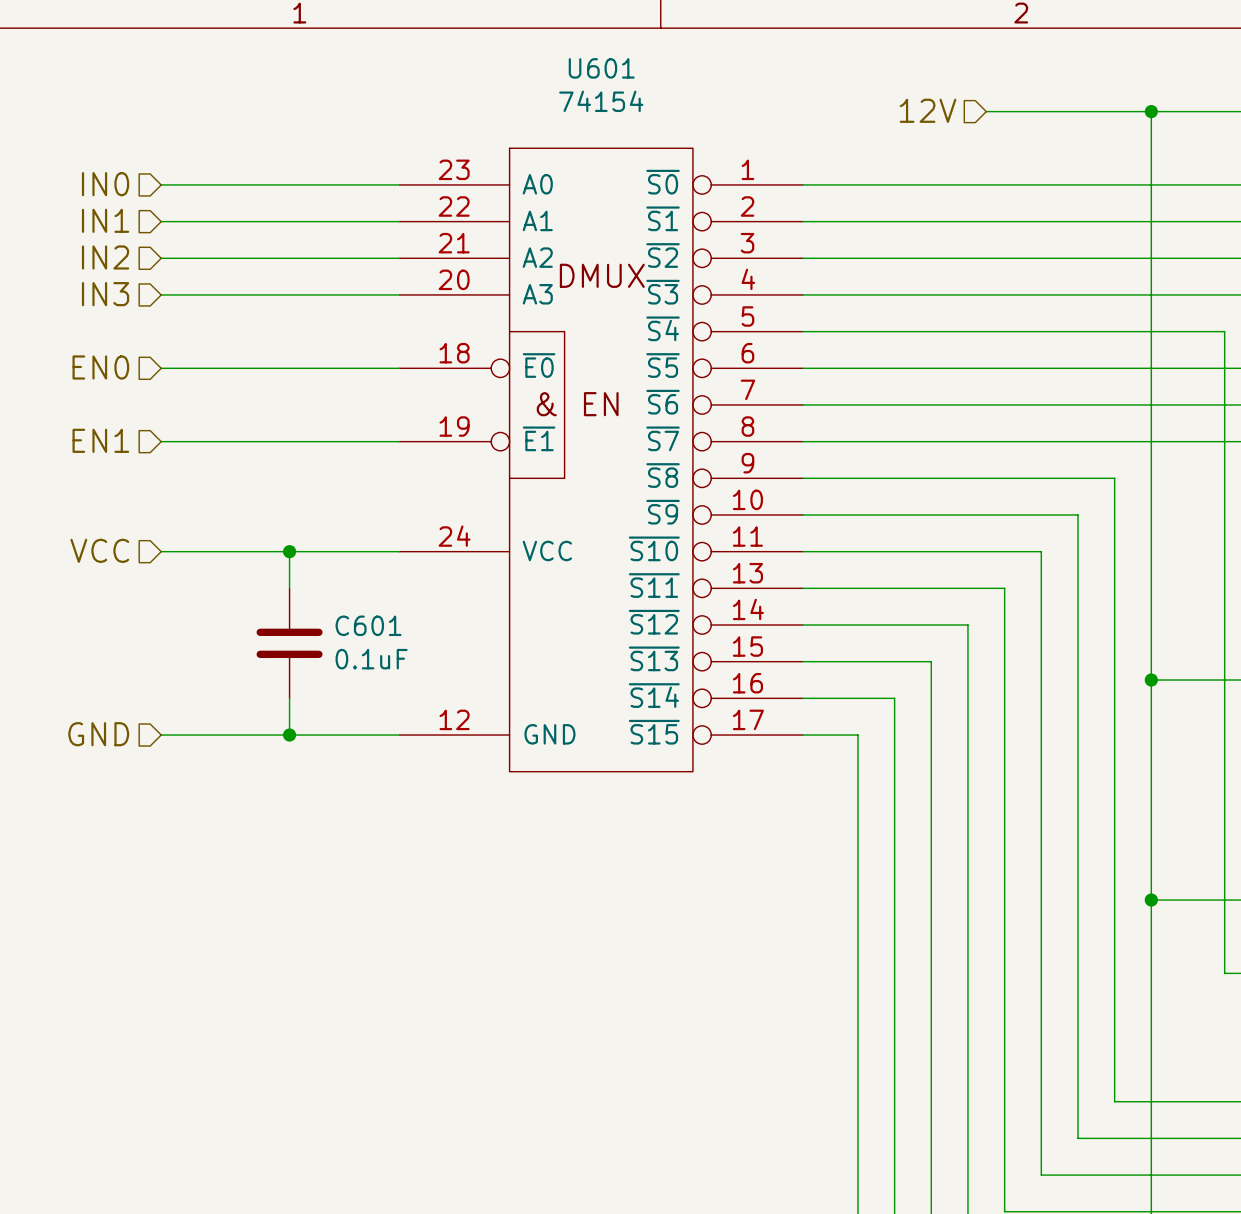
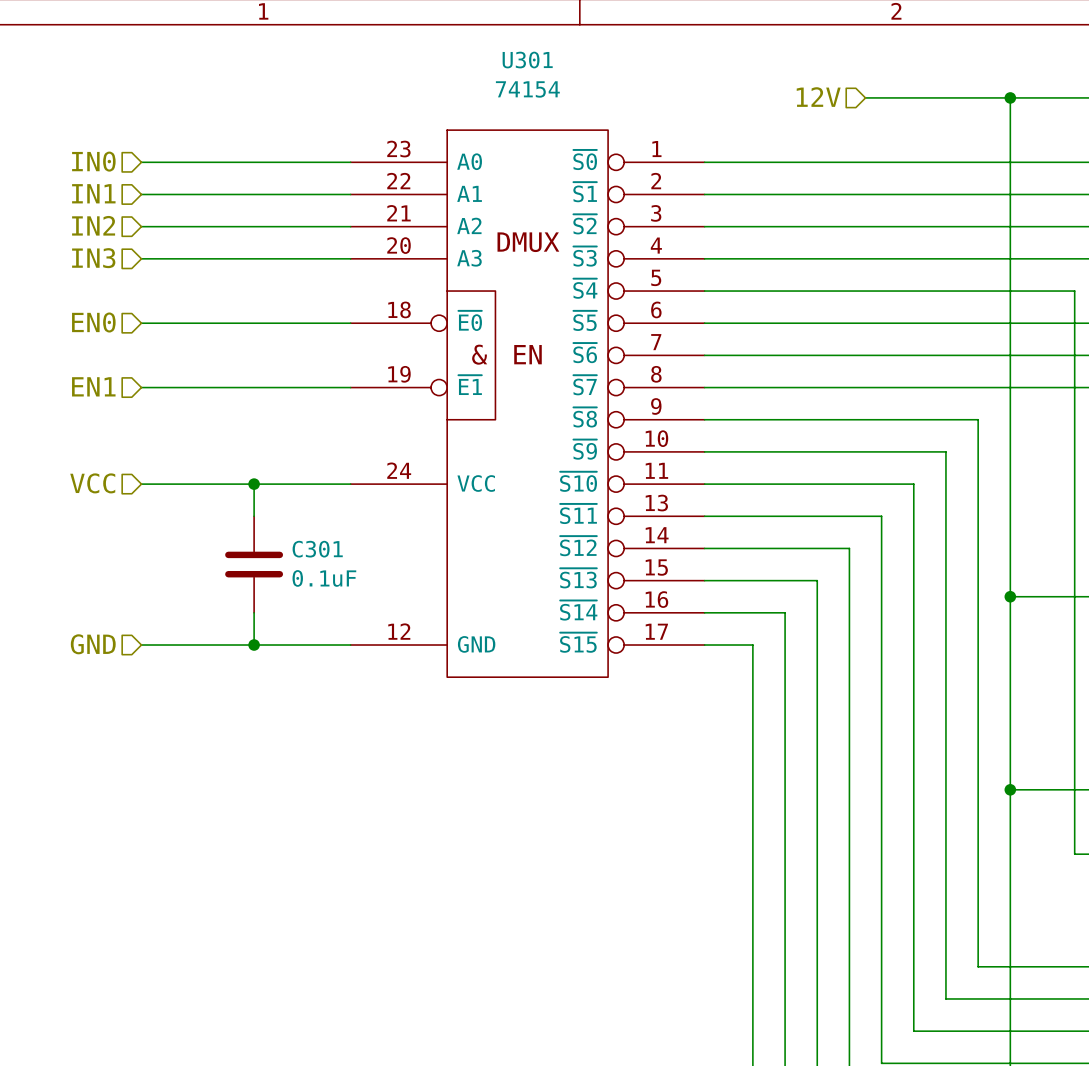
U601 name: U601 (601, 68) -> U301 (527, 60)
C601 name: C601 (368, 625) -> C301 (317, 549)

